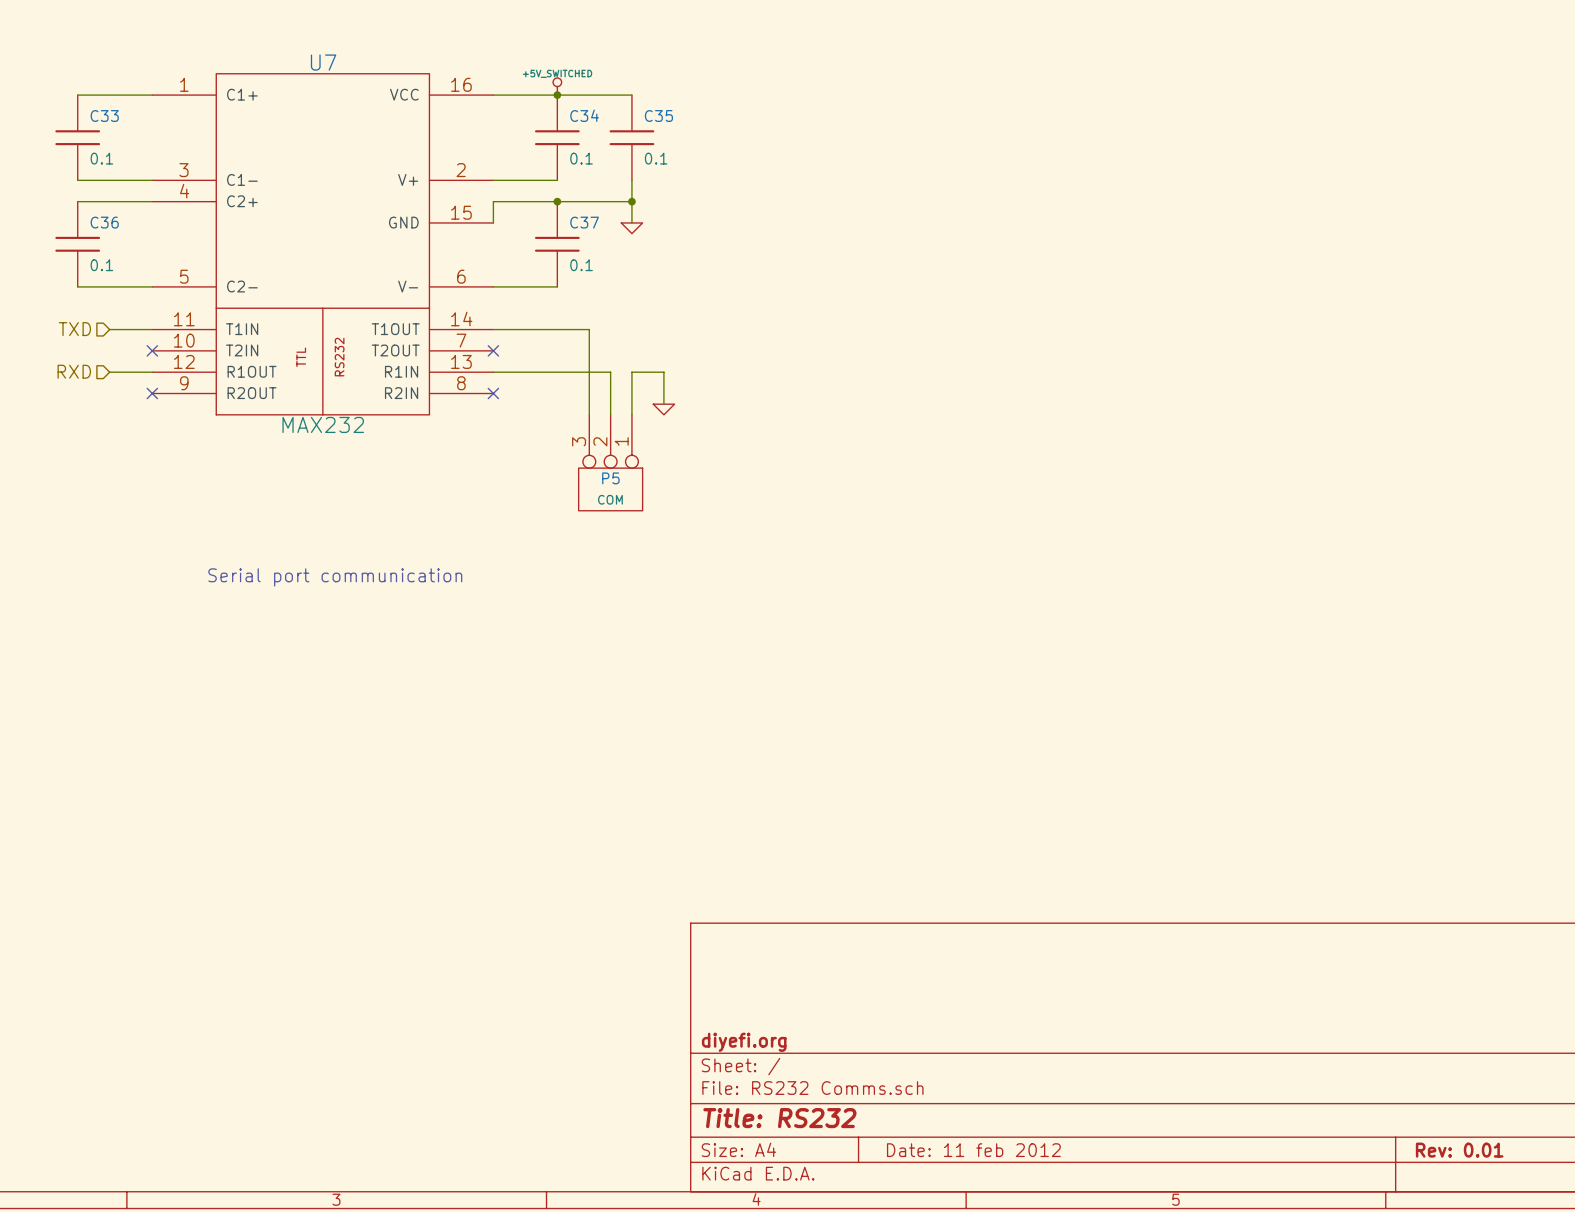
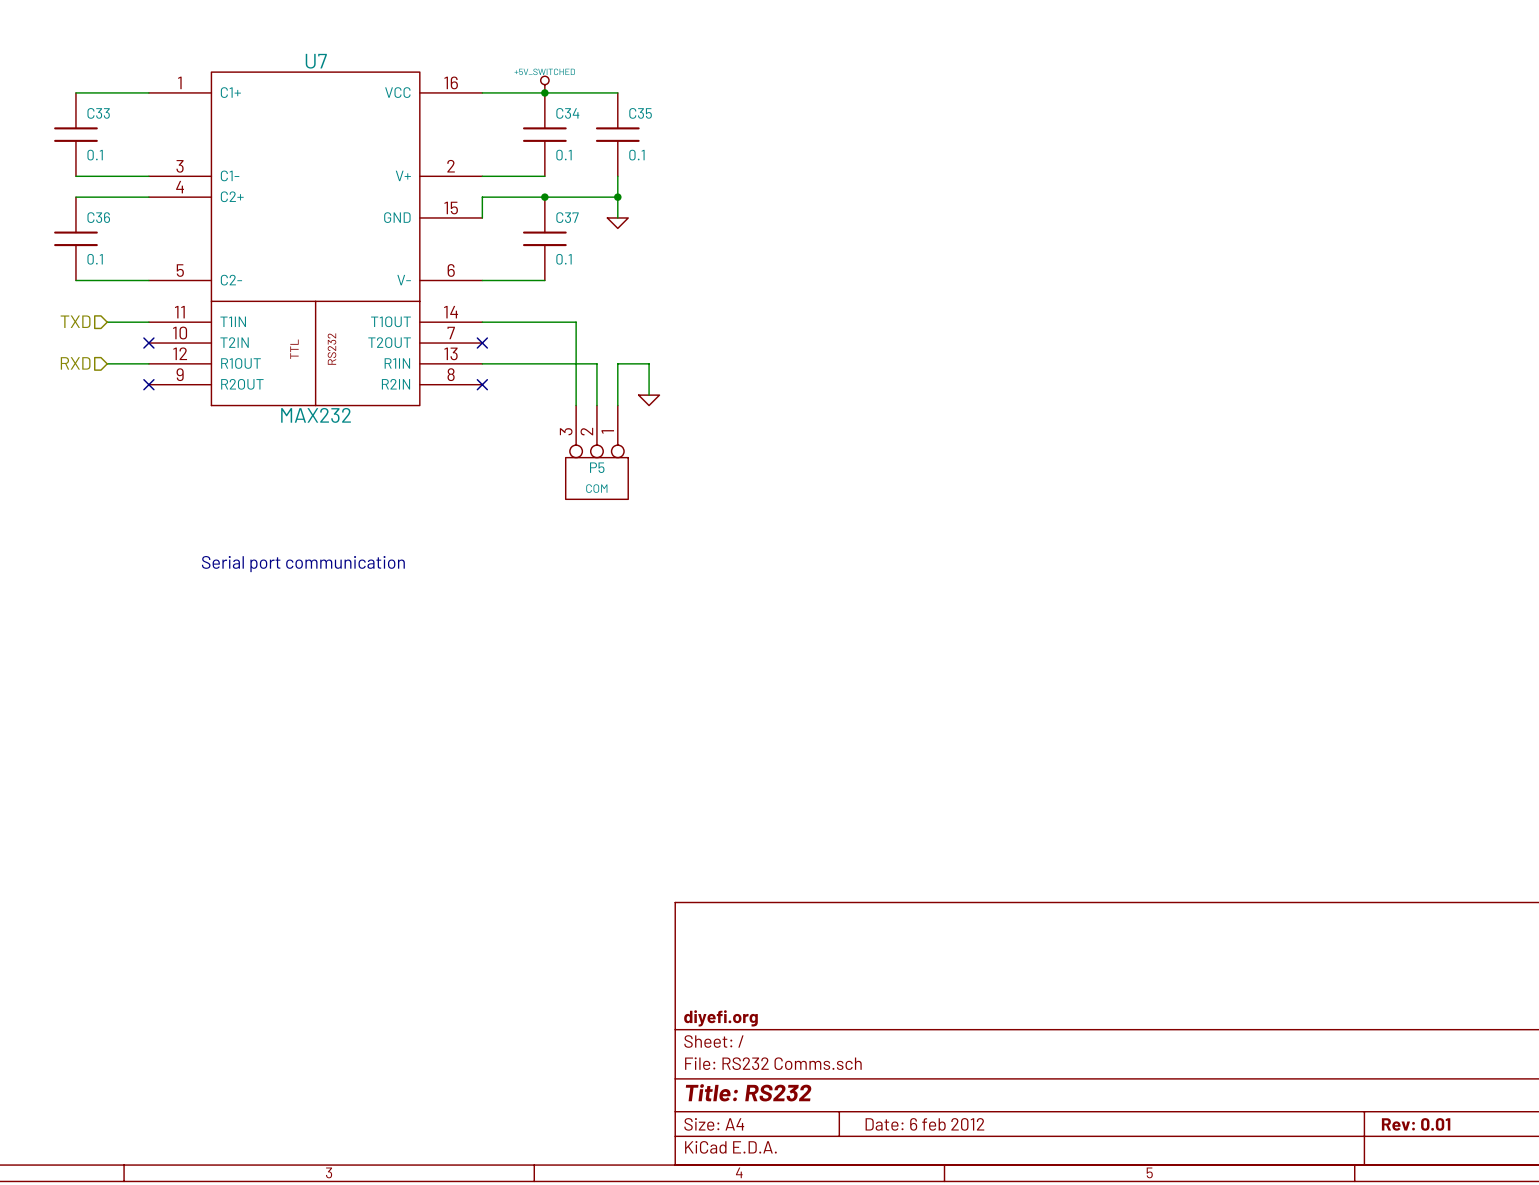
title block: Date: 11 feb 2012 (973, 1150) -> Date: 6 feb 2012 (924, 1124)

